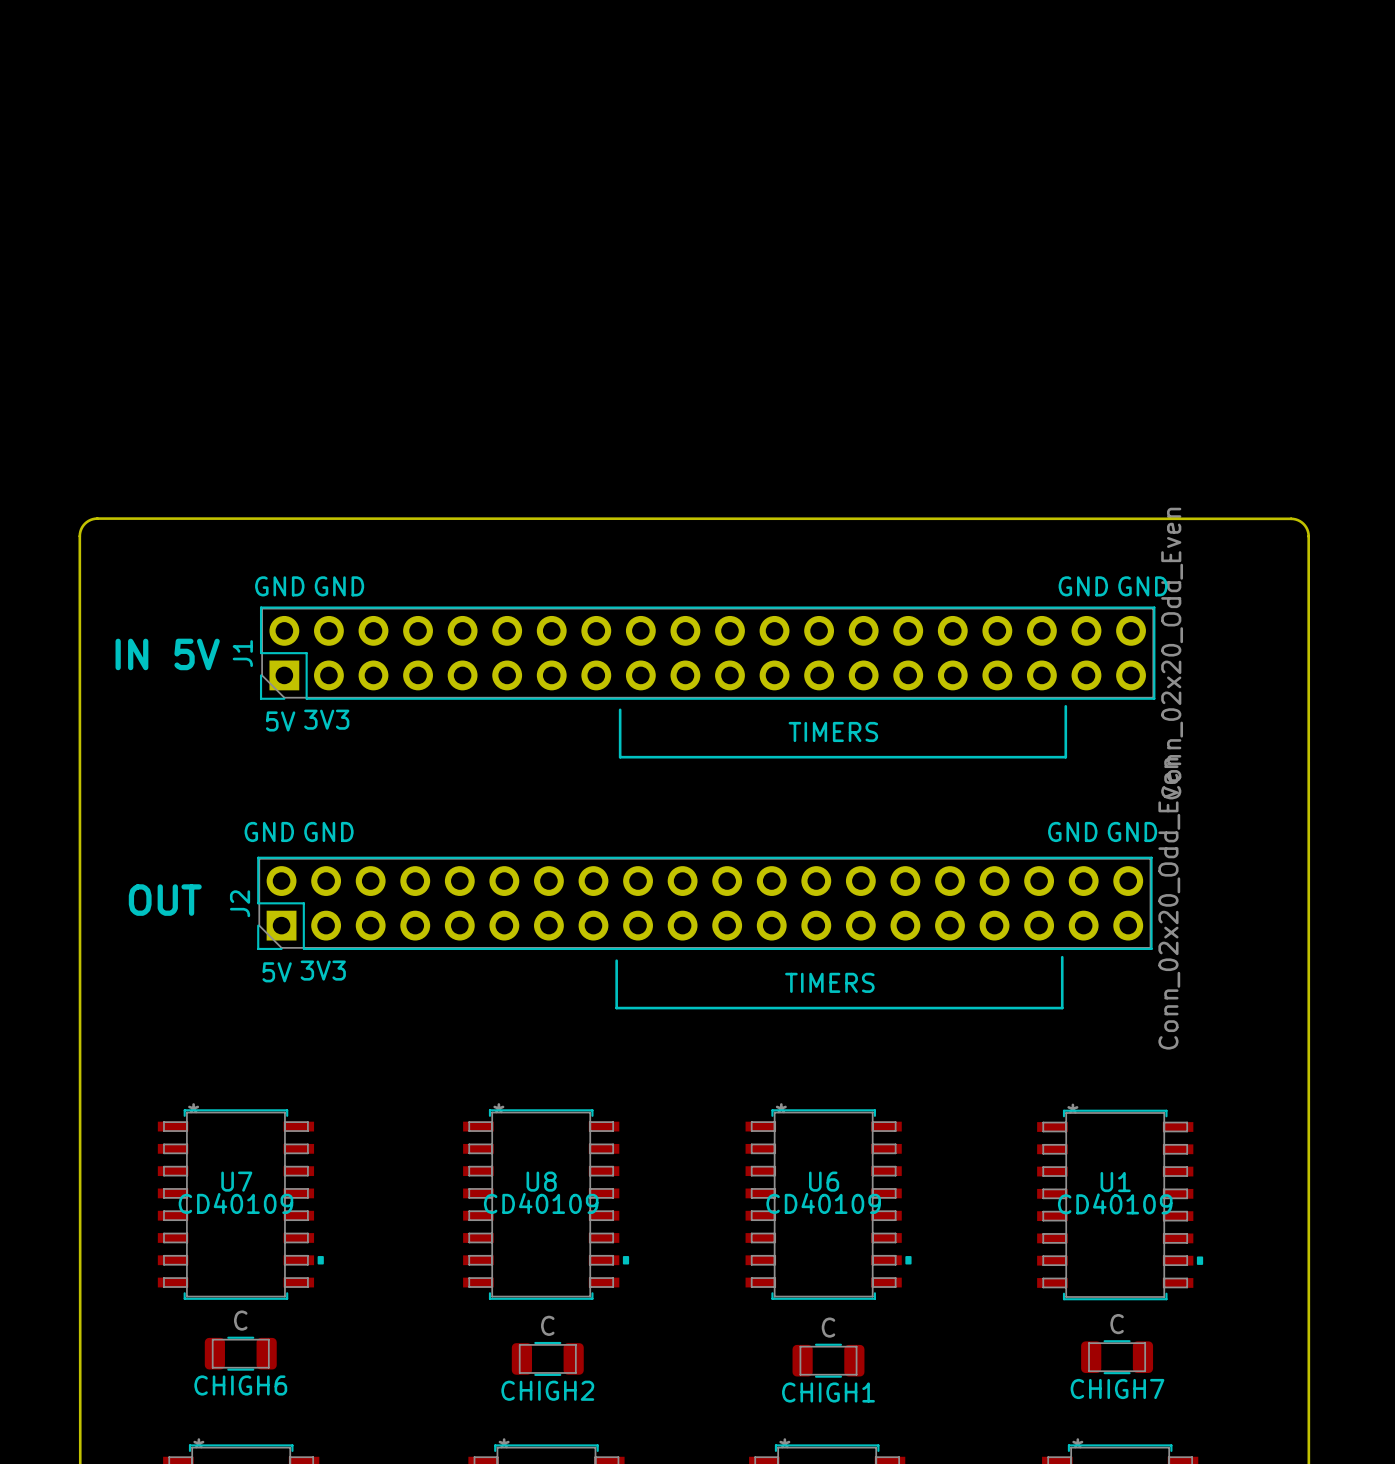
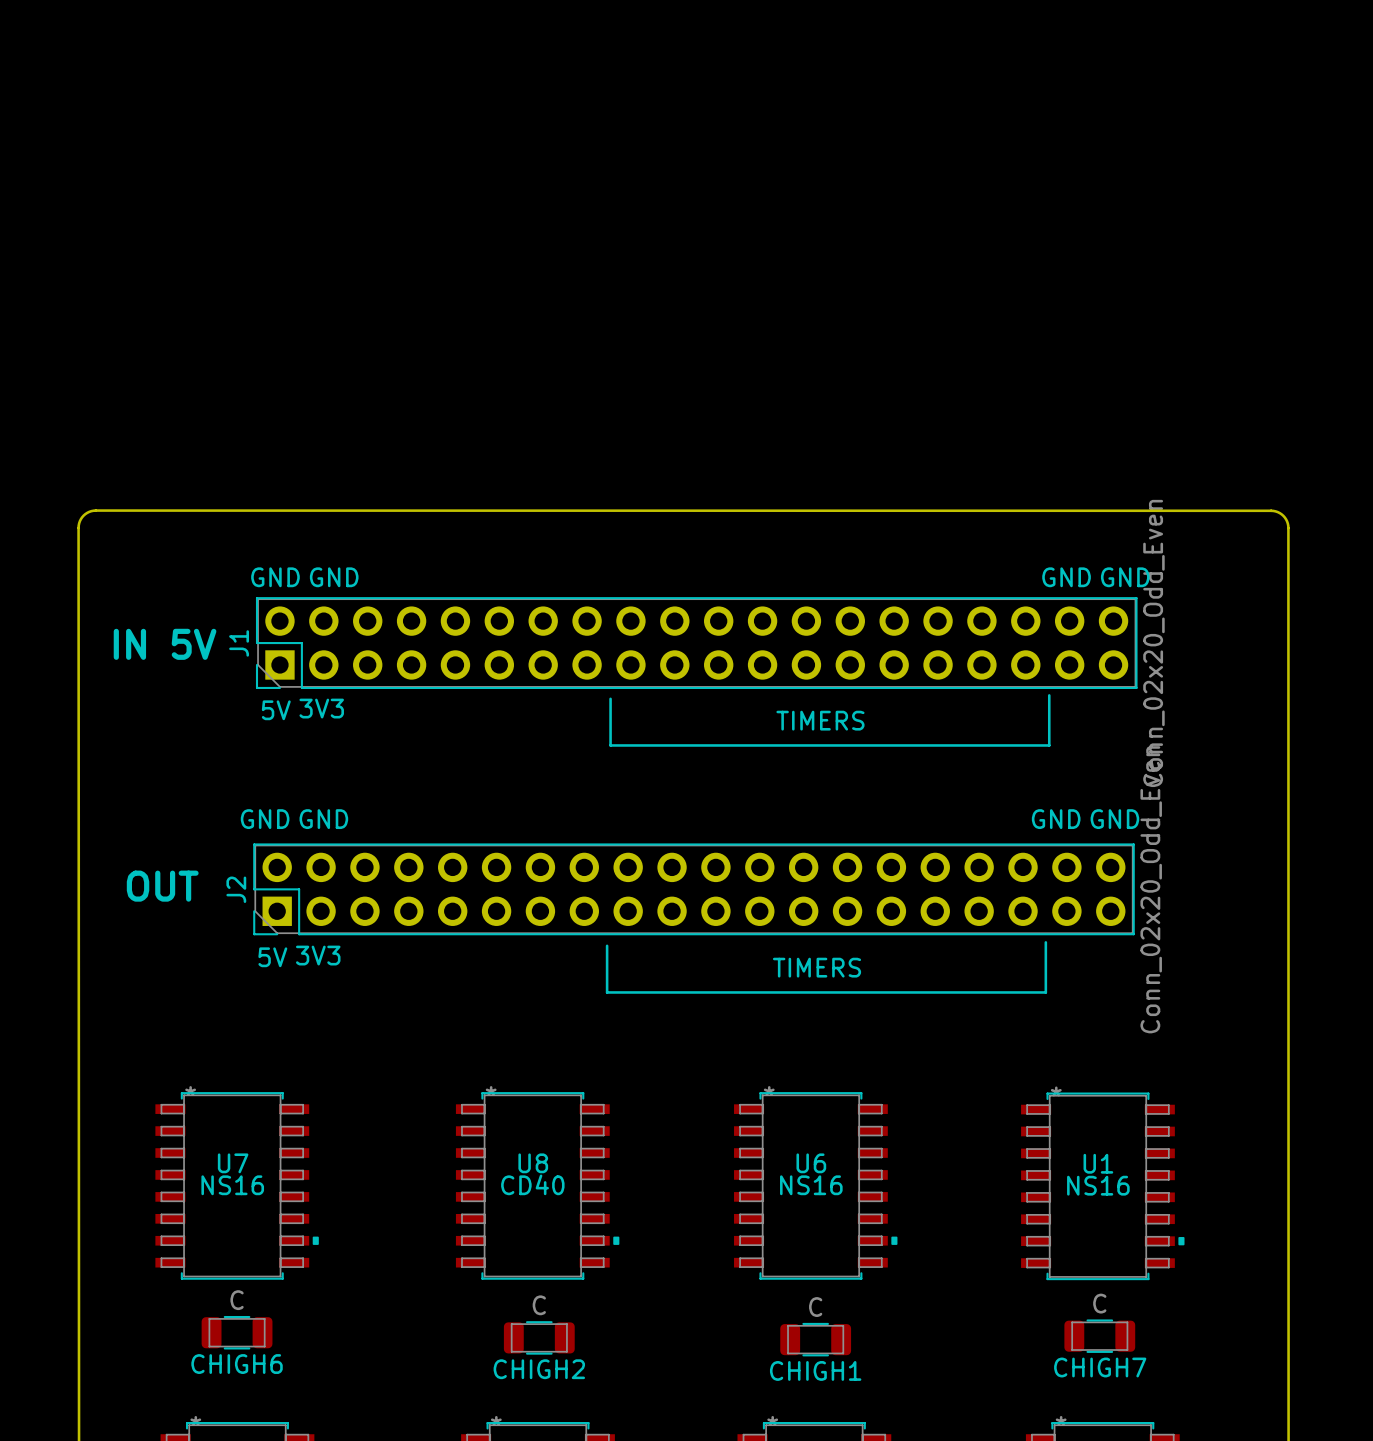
U7 value: CD40109 (235, 1203) -> NS16 (232, 1185)
U8 value: CD40109 (541, 1203) -> CD40 (532, 1184)
U6 value: CD40109 (823, 1203) -> NS16 (811, 1185)
U1 value: CD40109 (1115, 1203) -> NS16 (1098, 1185)

